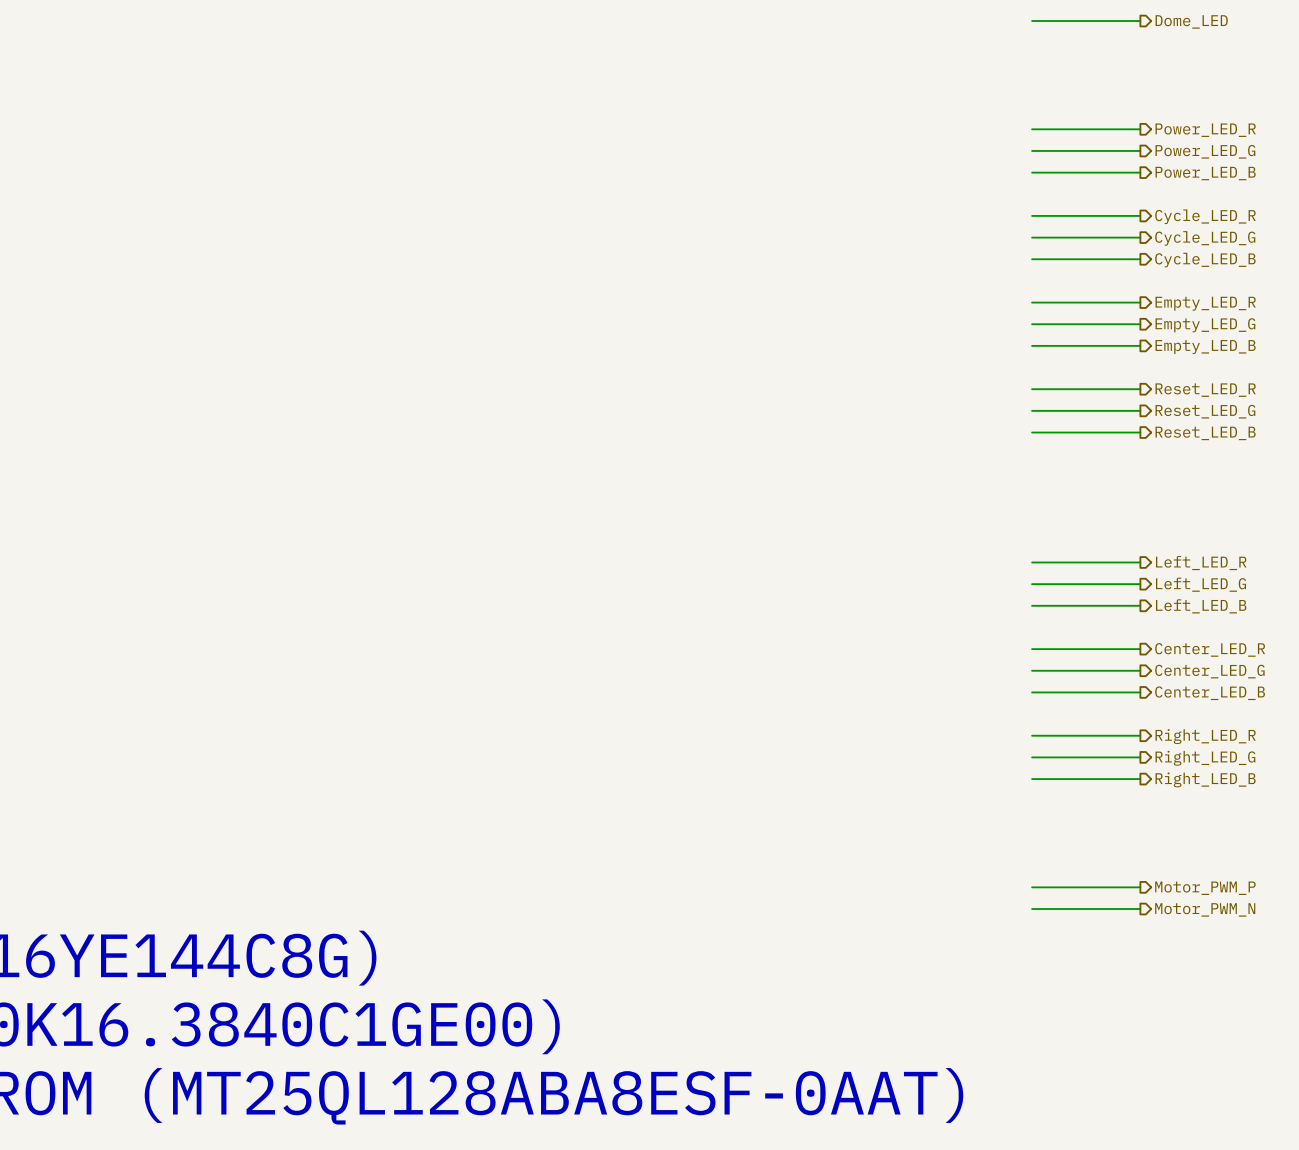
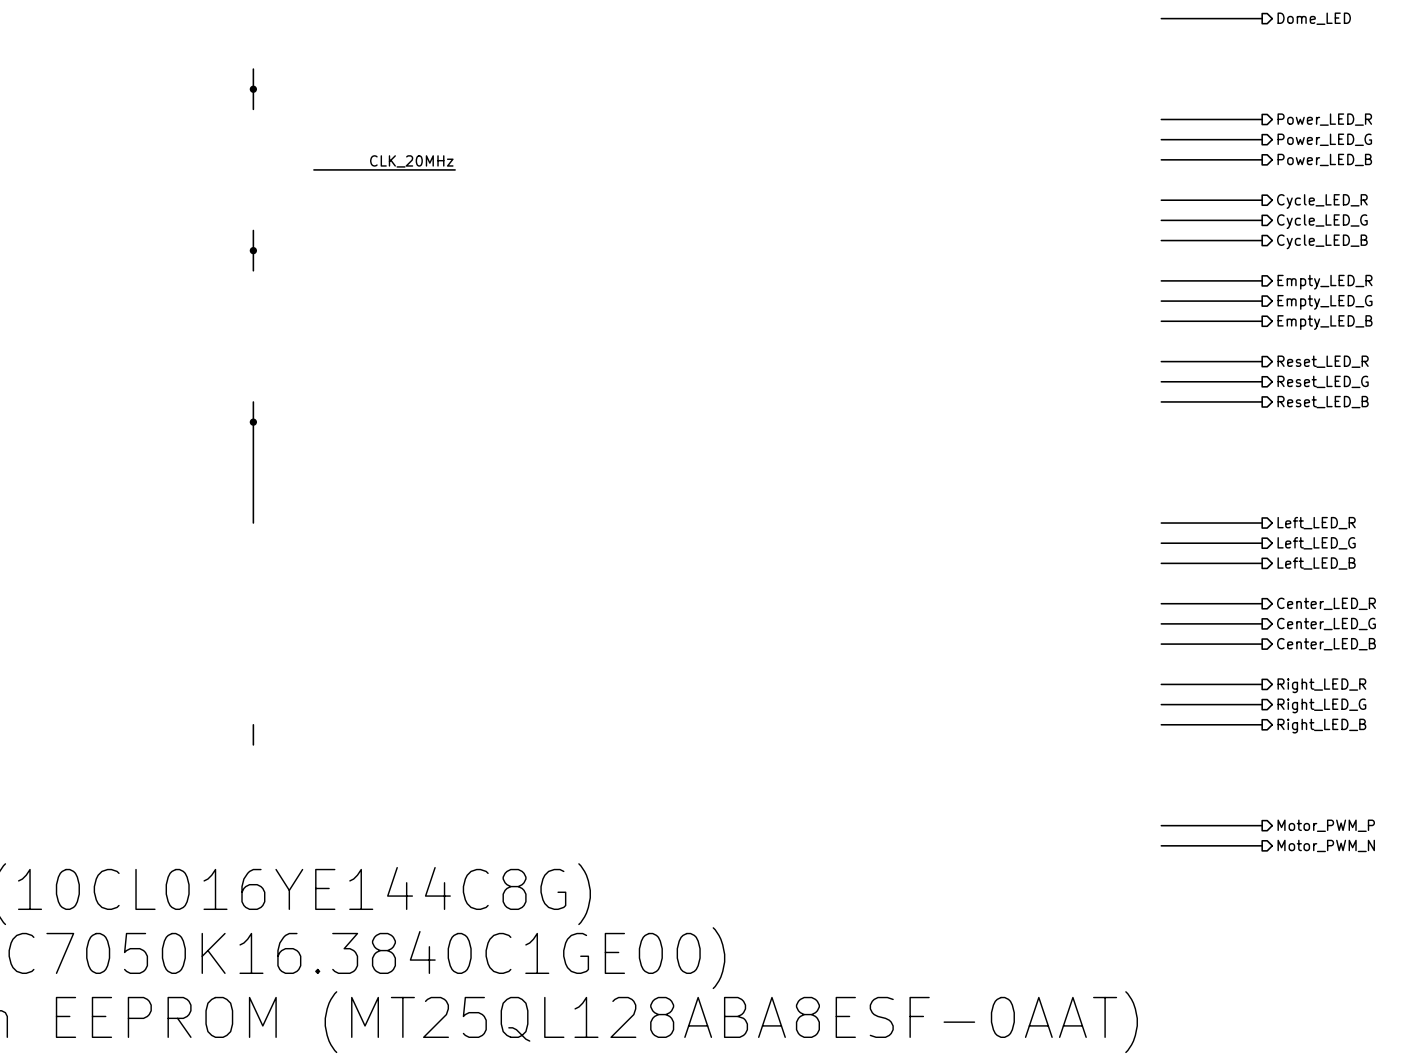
wire: none -> (253, 69) (253, 109)
junction: none -> (253, 89)
label: none -> CLK_20MHz (411, 161)
wire: none -> (313, 169) (455, 169)
wire: none -> (253, 230) (253, 270)
junction: none -> (253, 250)
wire: none -> (253, 401) (253, 523)
junction: none -> (253, 422)
wire: none -> (253, 724) (253, 744)

